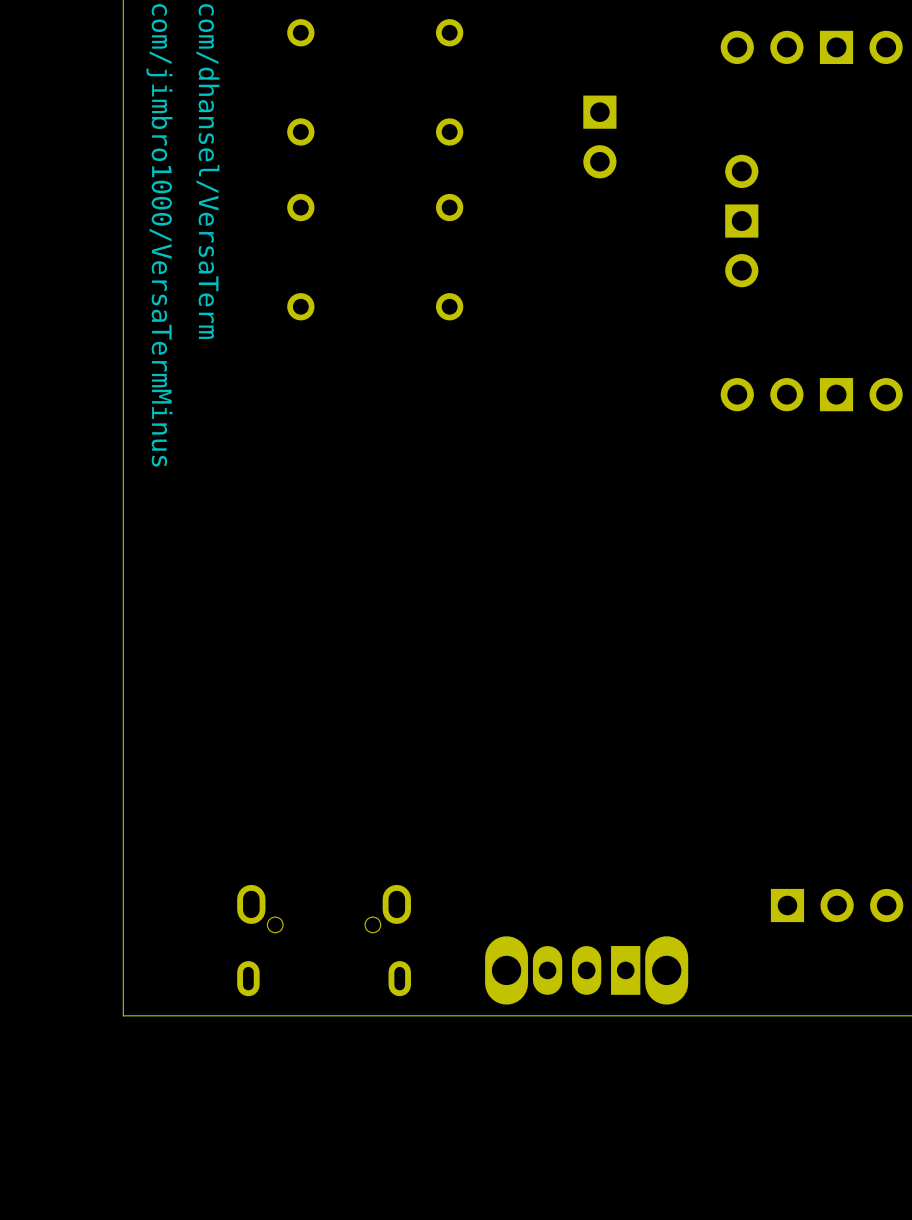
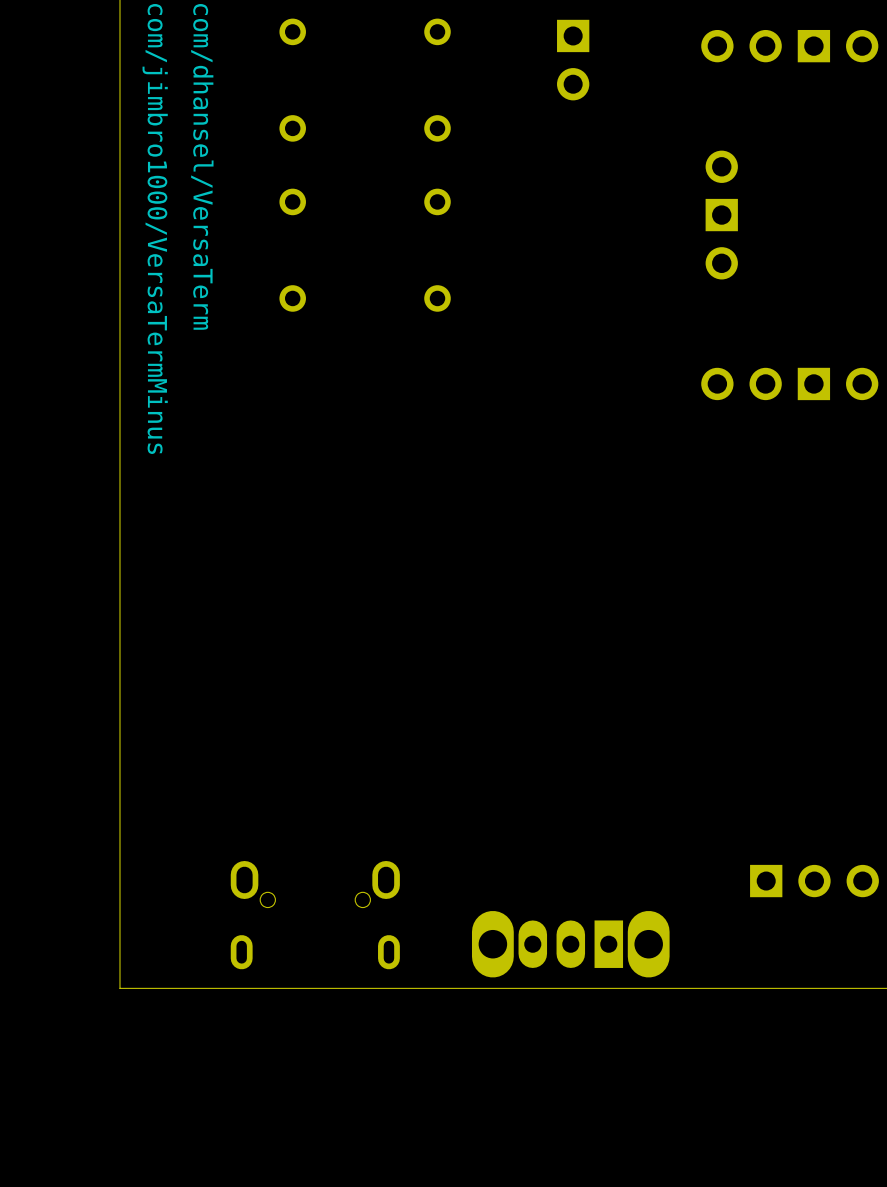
part position: (599, 136) -> (573, 60)

